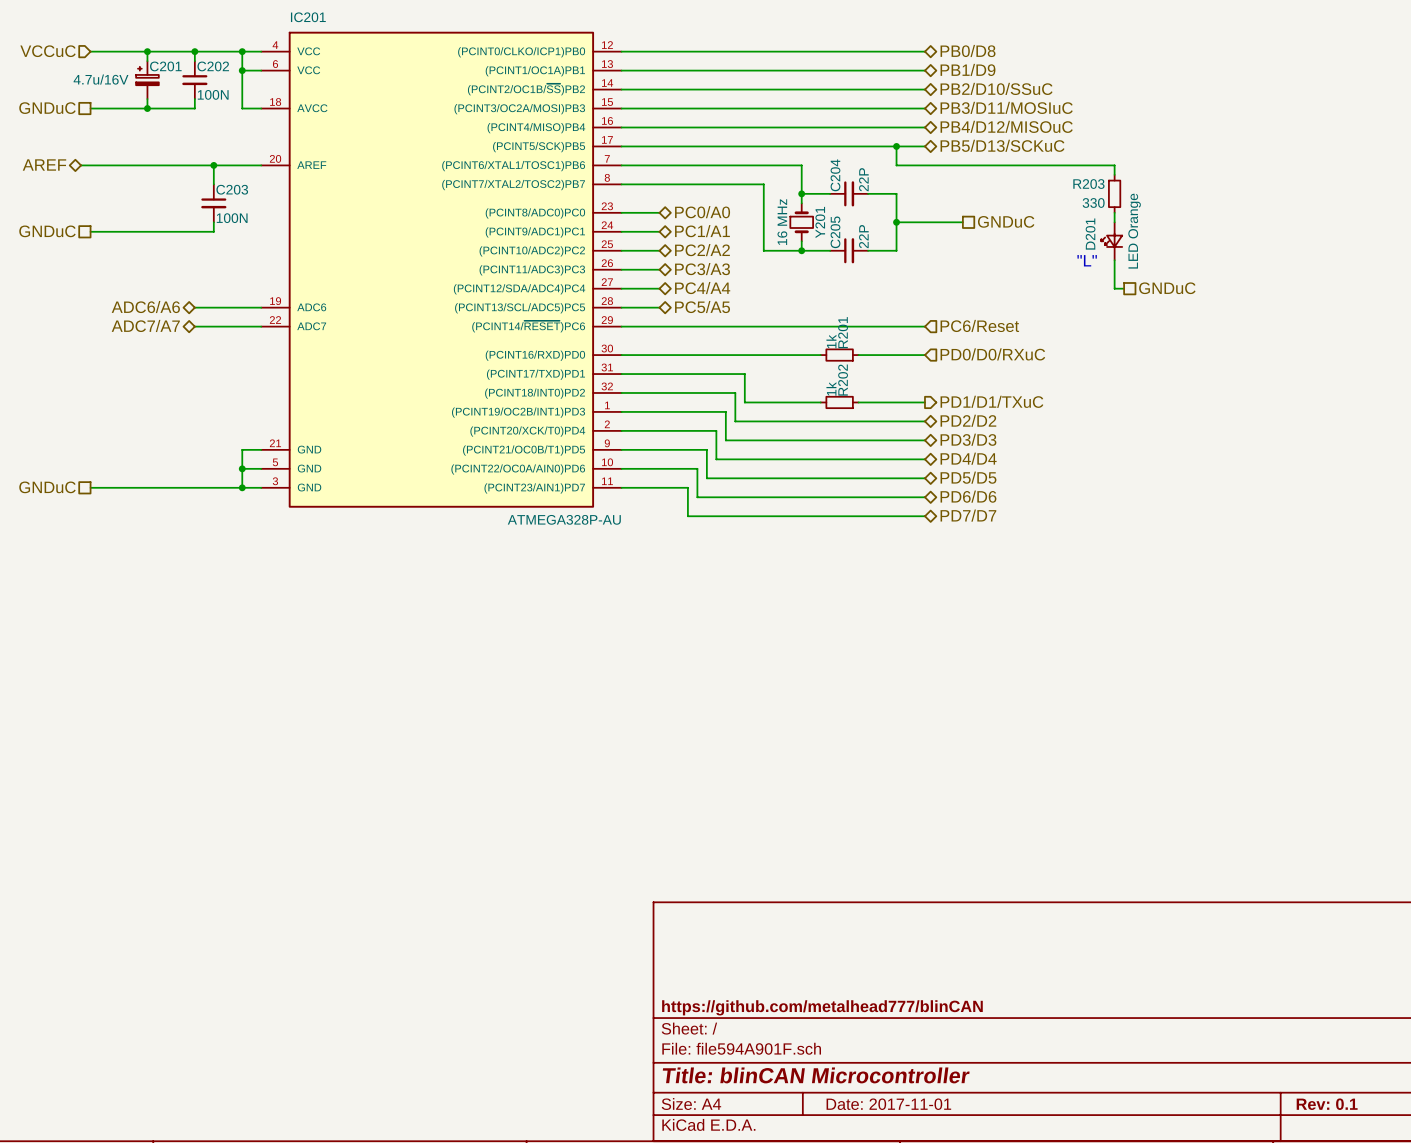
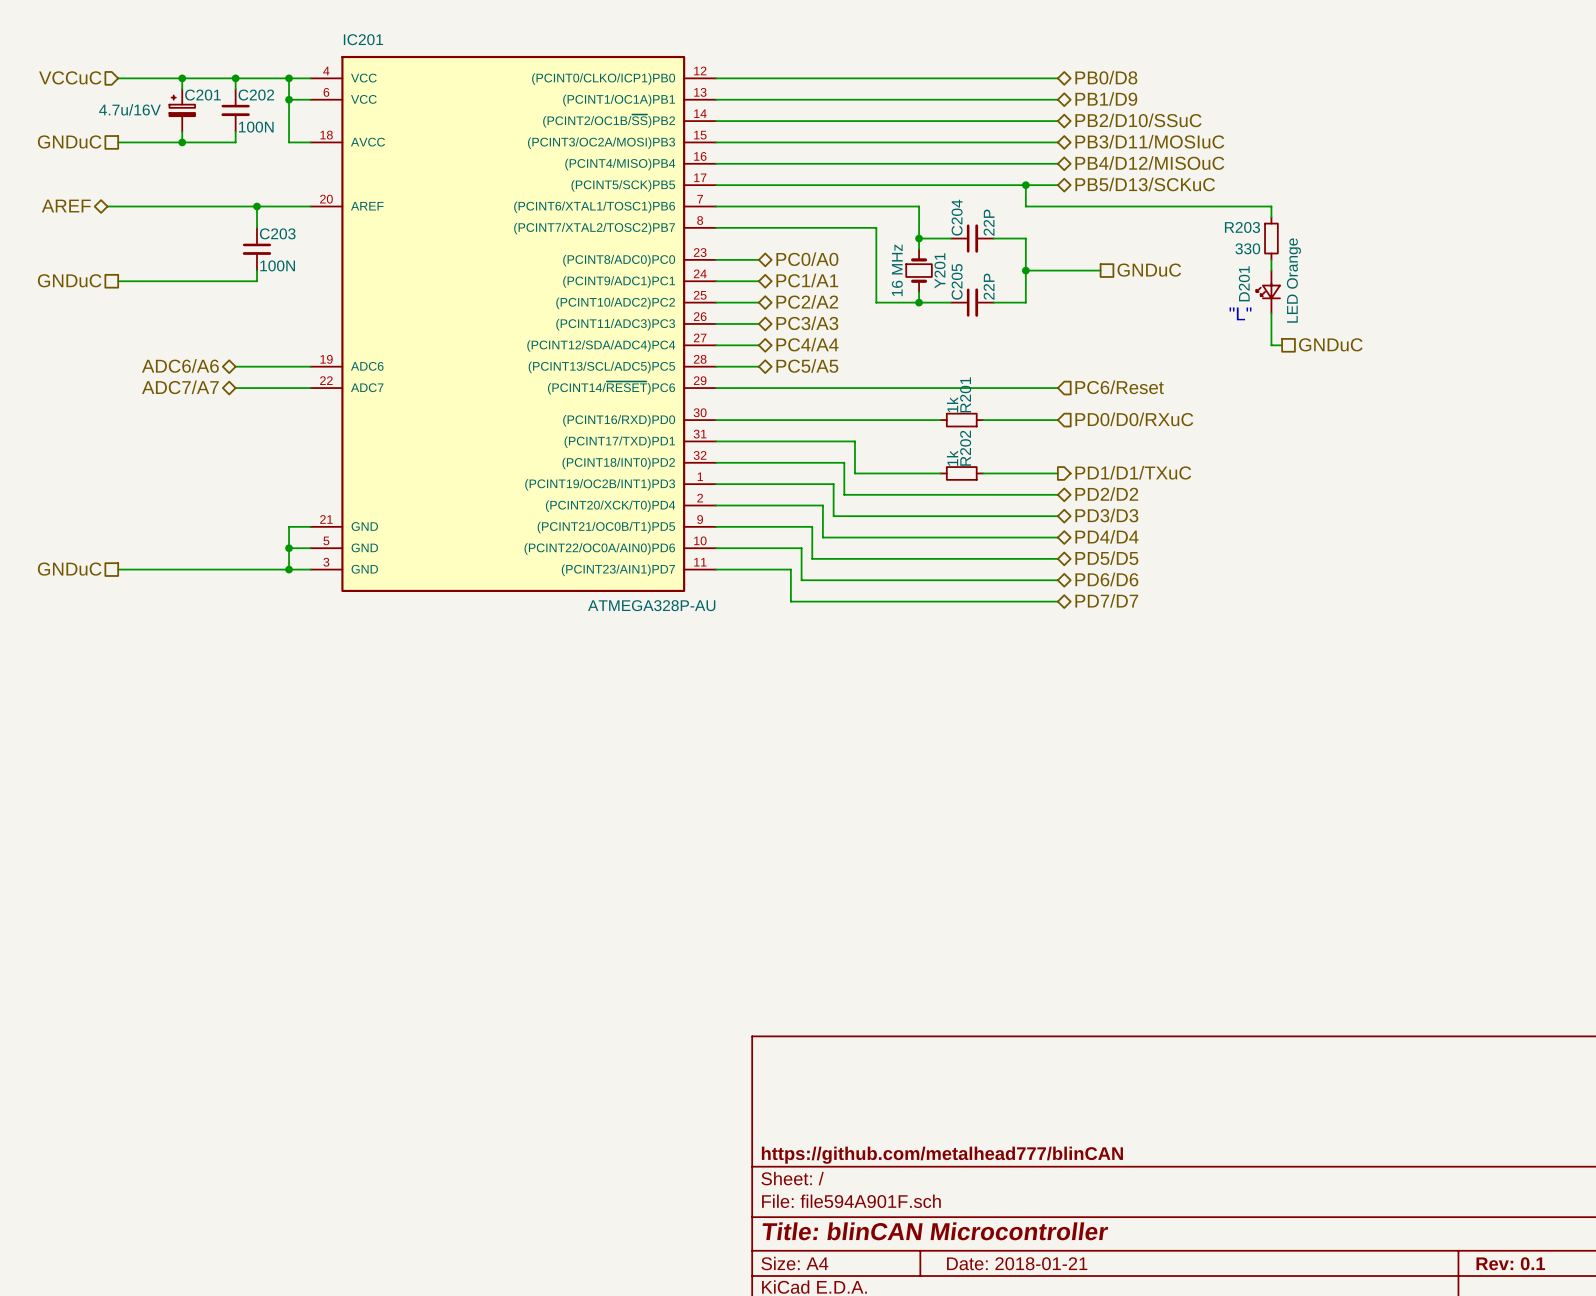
title block: Date: 2017-11-01 (888, 1104) -> Date: 2018-01-21 (1017, 1263)

